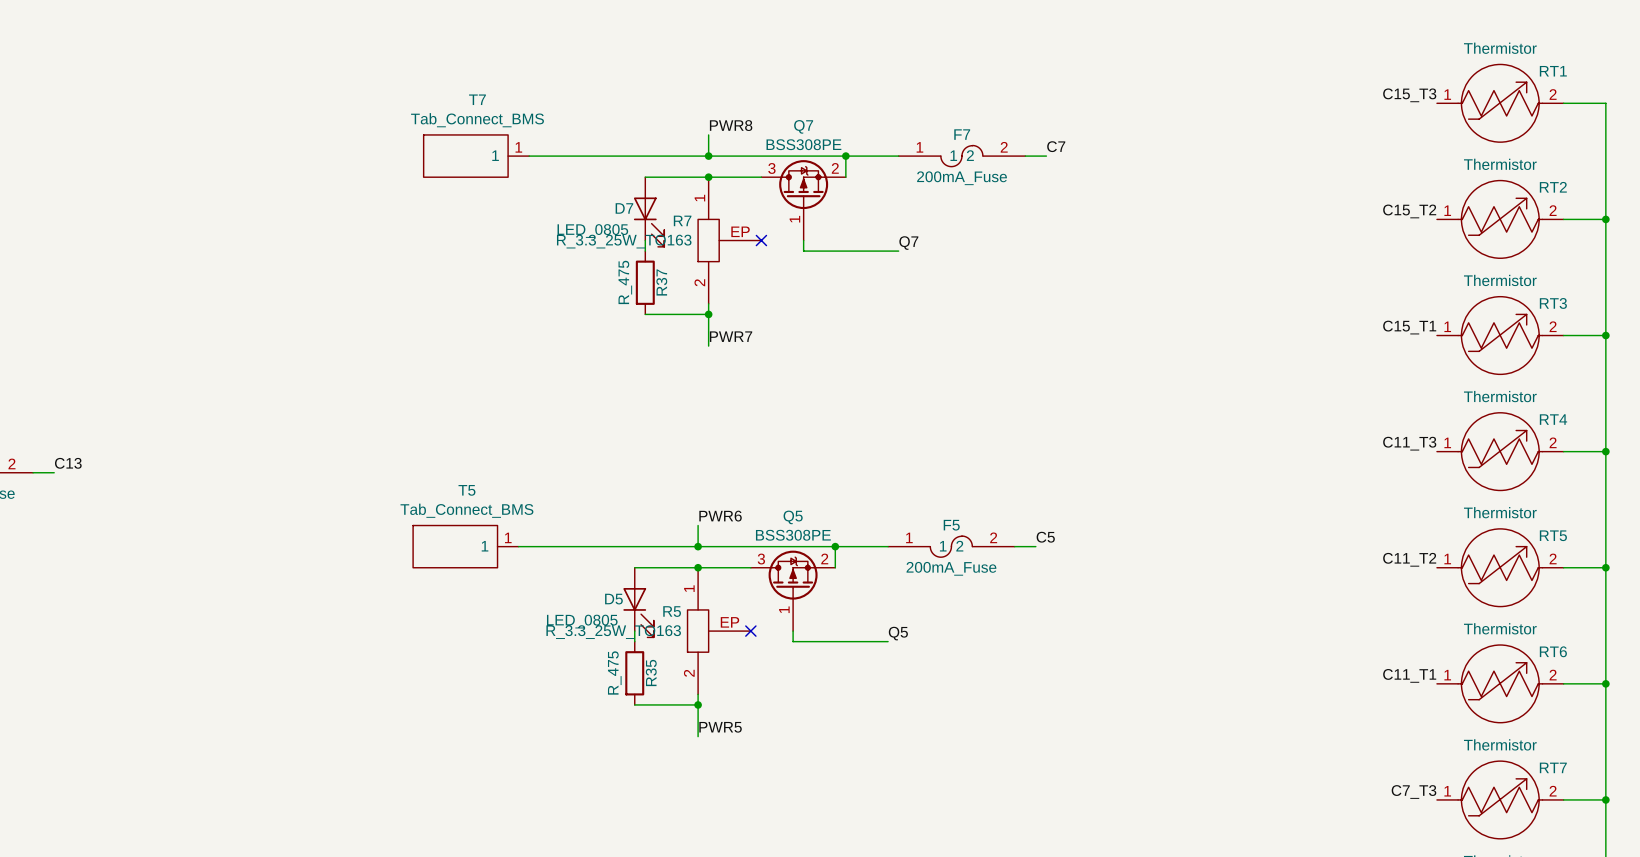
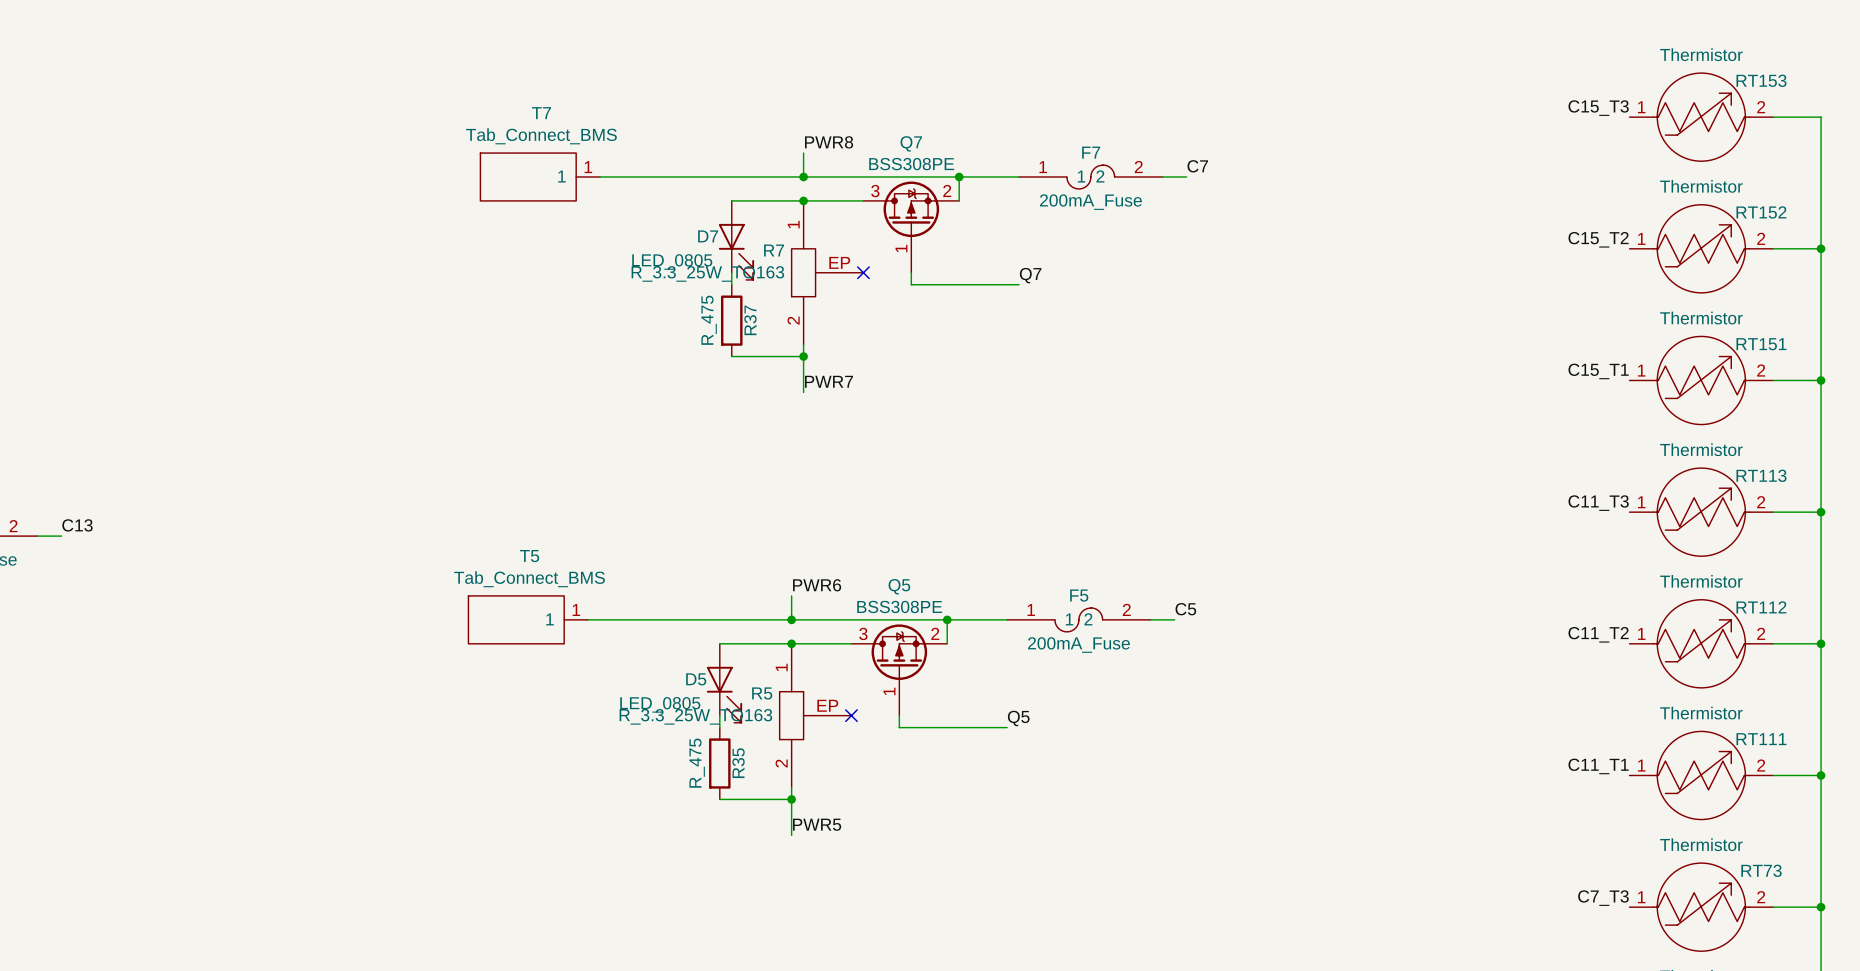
RT1 name: RT1 (1553, 71) -> RT153 (1761, 80)
RT2 name: RT2 (1553, 187) -> RT152 (1761, 212)
RT3 name: RT3 (1553, 303) -> RT151 (1761, 344)
RT4 name: RT4 (1553, 419) -> RT113 (1761, 475)
RT5 name: RT5 (1553, 535) -> RT112 (1761, 607)
RT6 name: RT6 (1553, 651) -> RT111 (1761, 739)
RT7 name: RT7 (1553, 767) -> RT73 (1761, 870)

